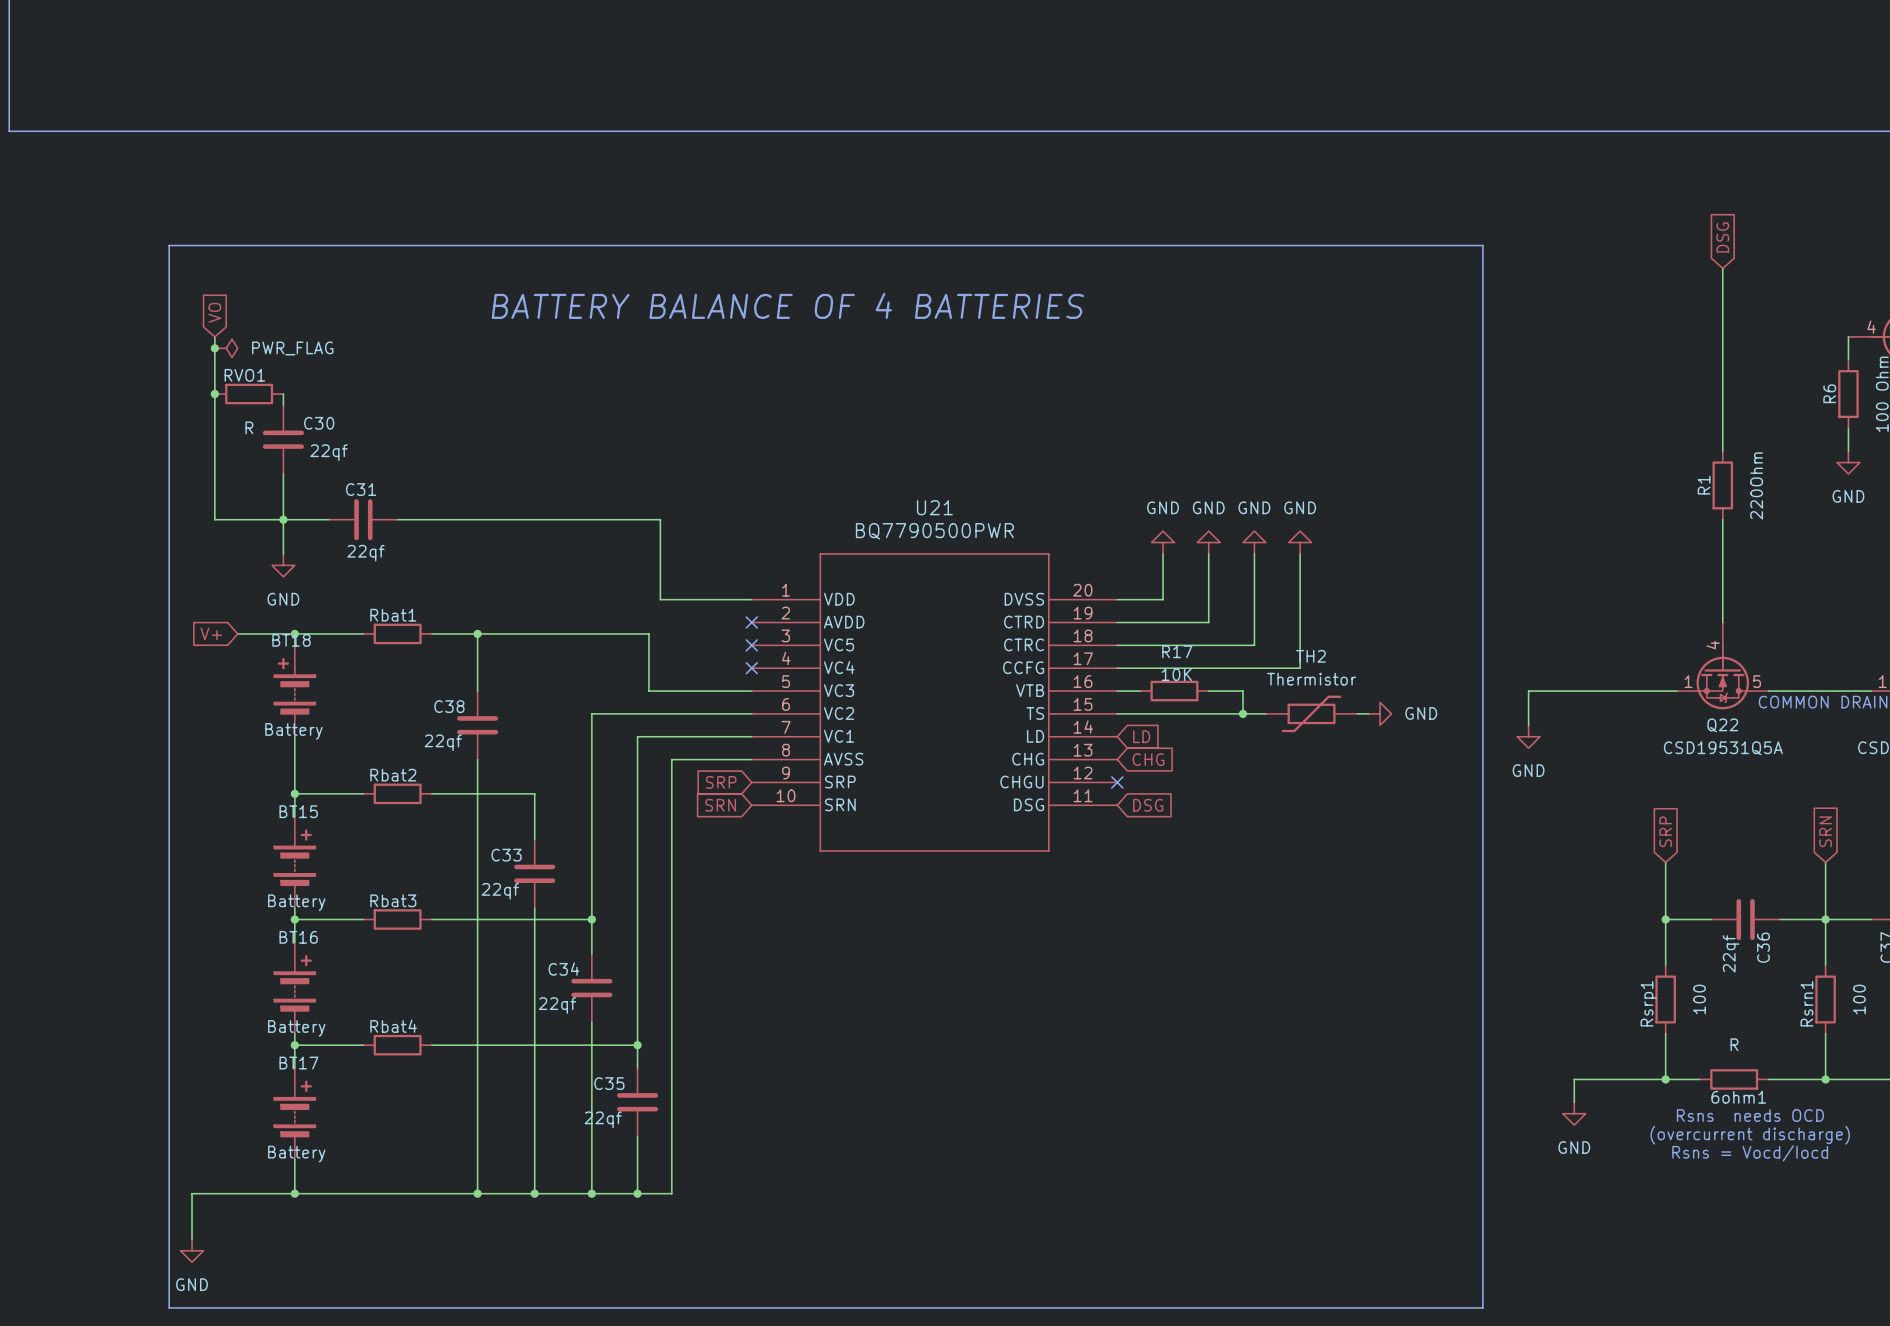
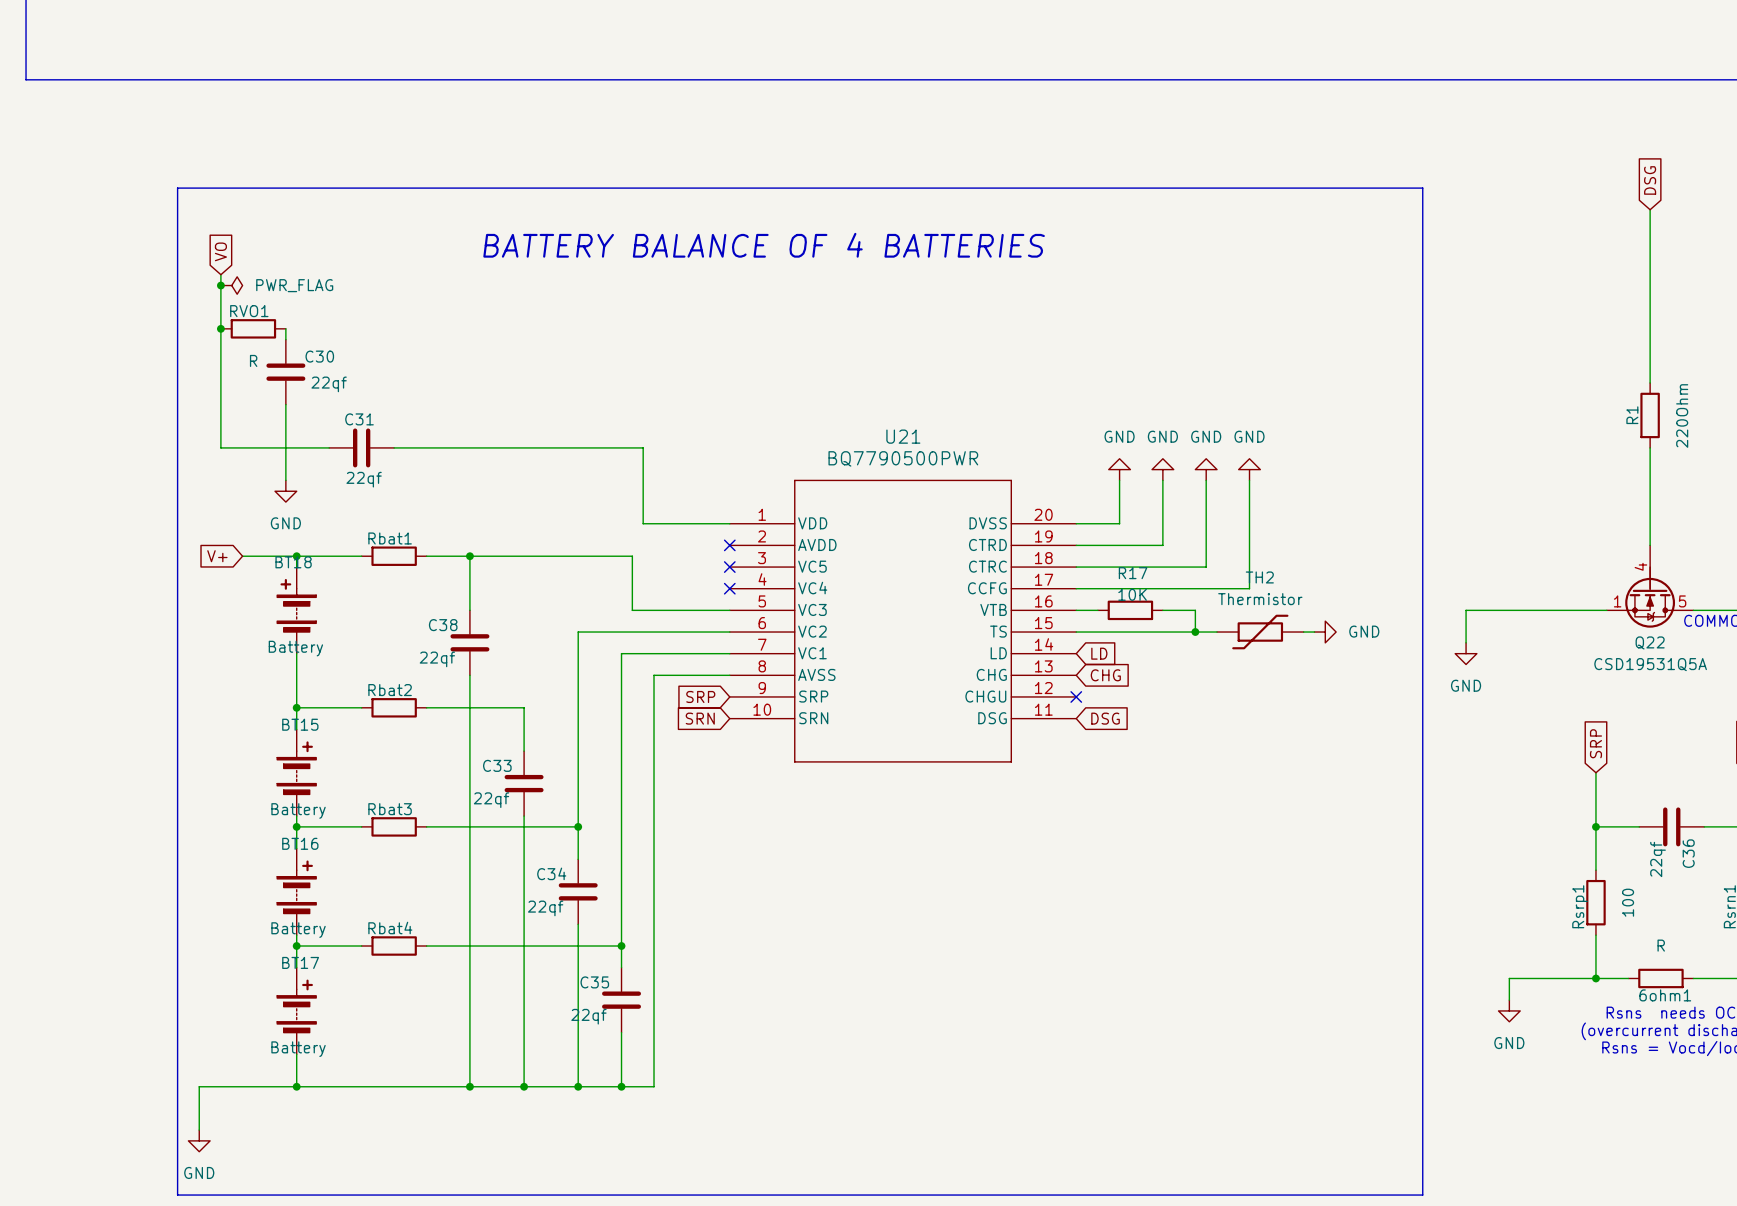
junction: (283, 519) -> none

